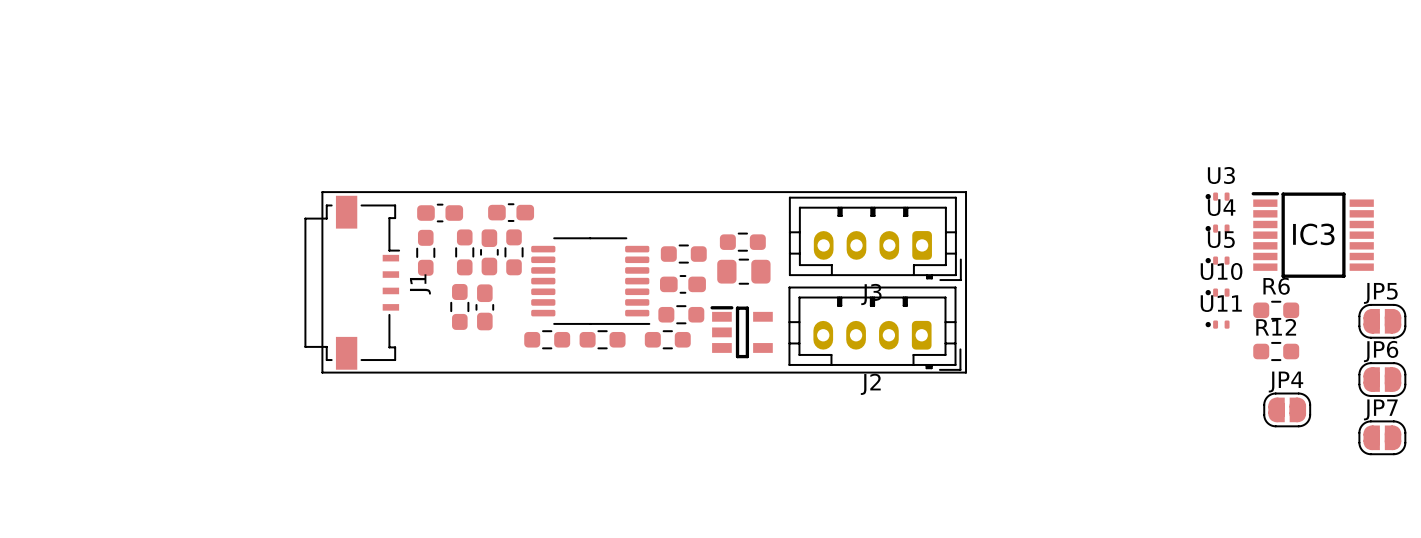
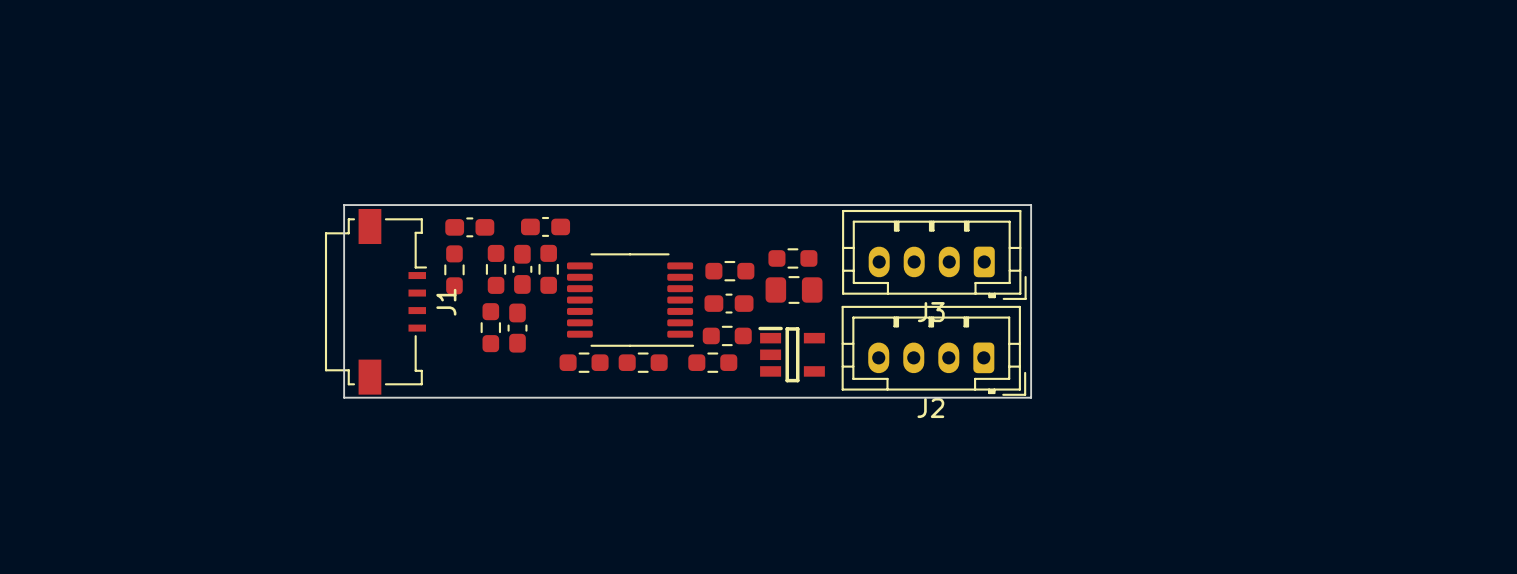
U3: (1217, 196) -> none
U4: (1217, 228) -> none
IC3: (1312, 234) -> none
U5: (1217, 260) -> none
U10: (1217, 292) -> none
R6: (1276, 310) -> none
JP5: (1382, 321) -> none
U11: (1217, 324) -> none
R12: (1276, 351) -> none
JP6: (1382, 379) -> none
JP4: (1287, 409) -> none
JP7: (1382, 437) -> none

